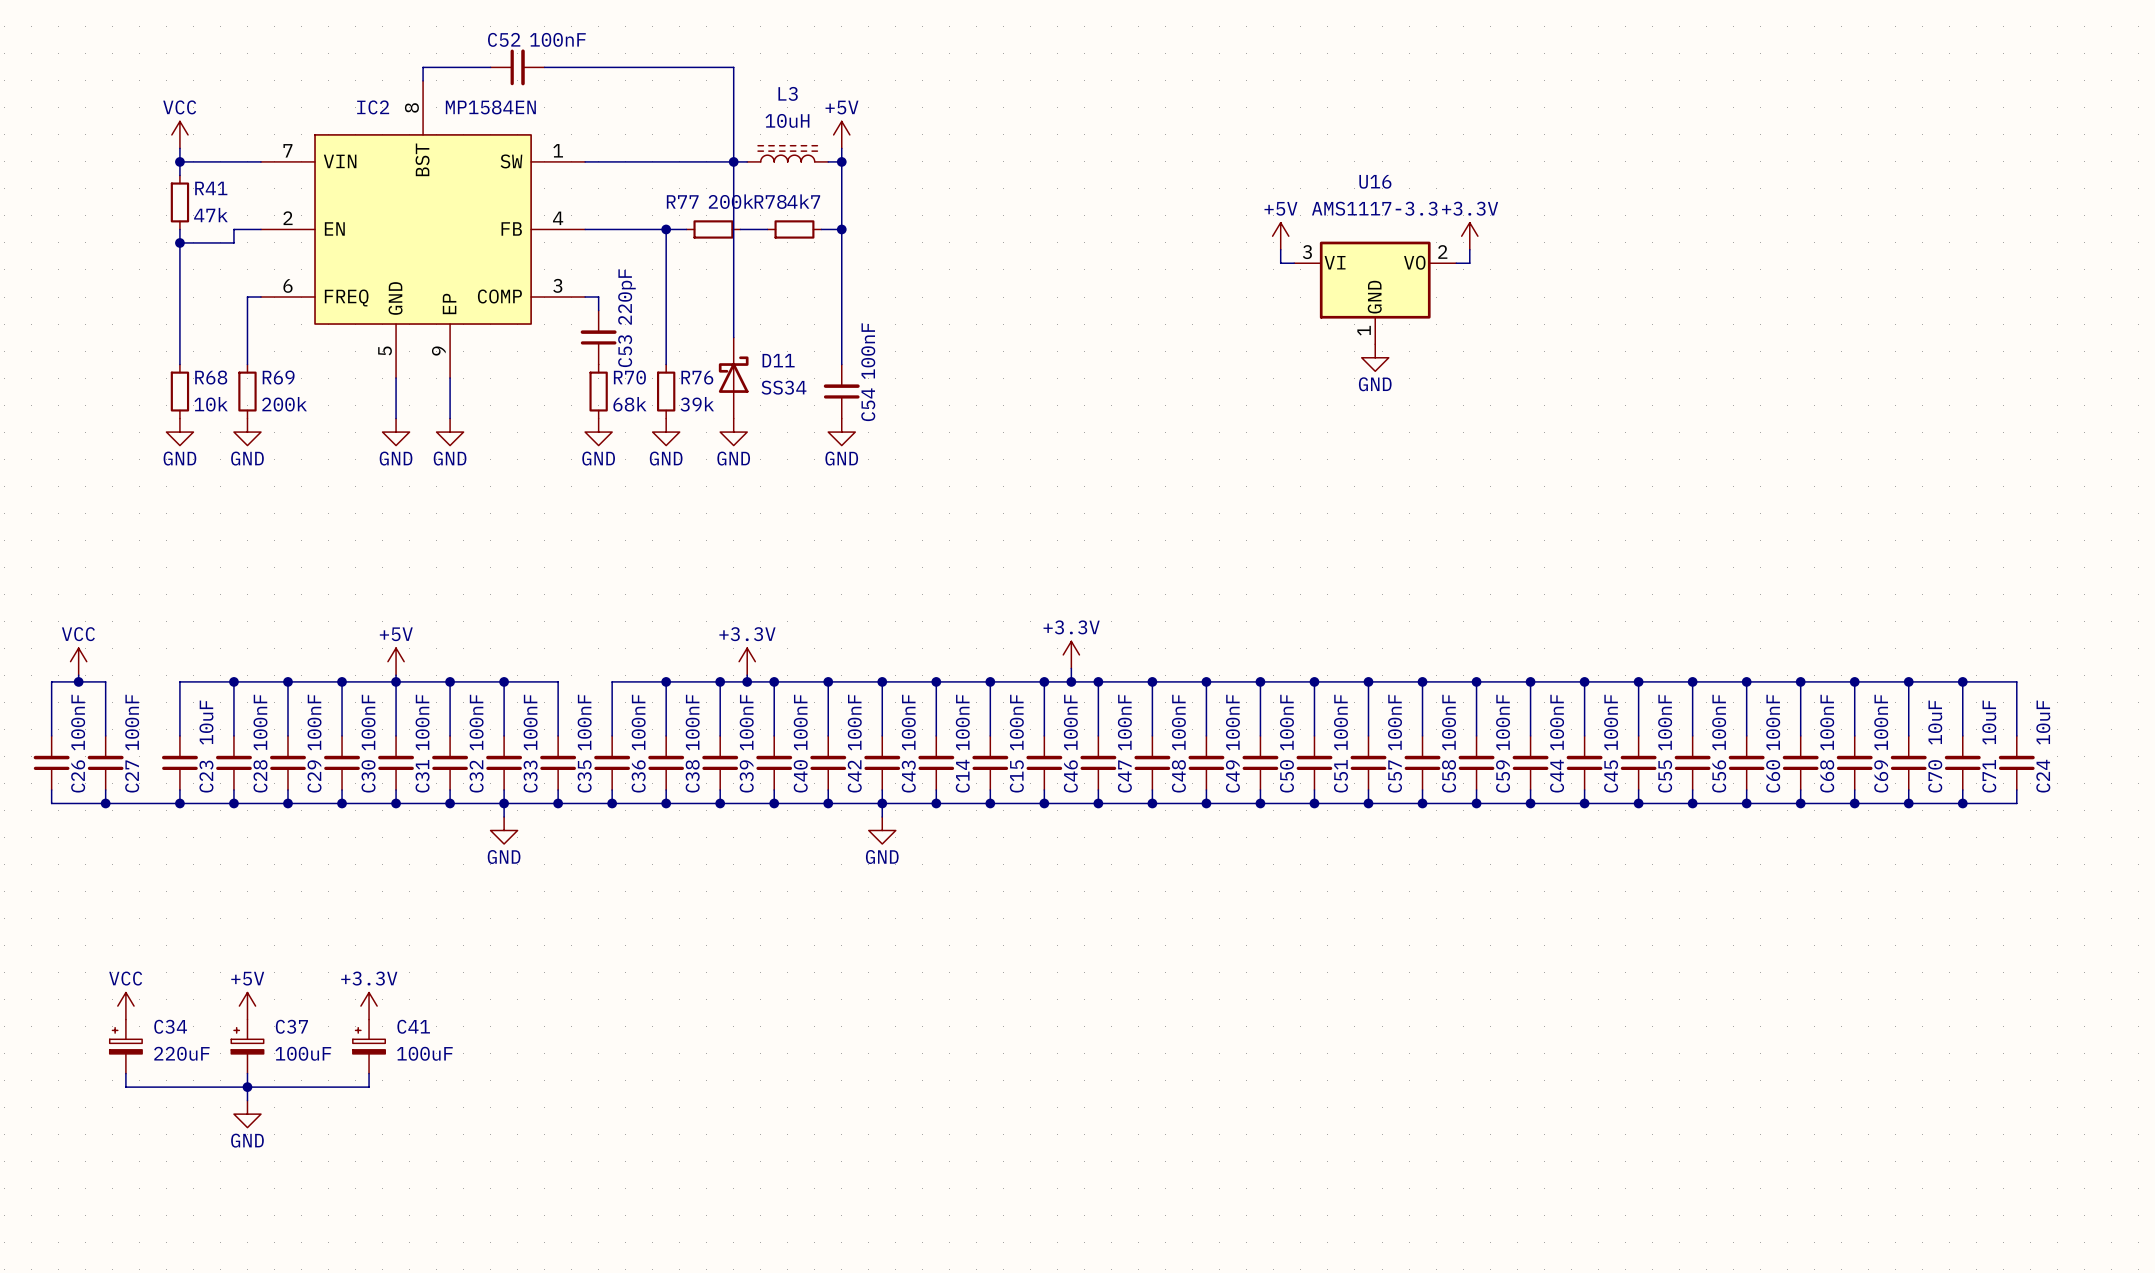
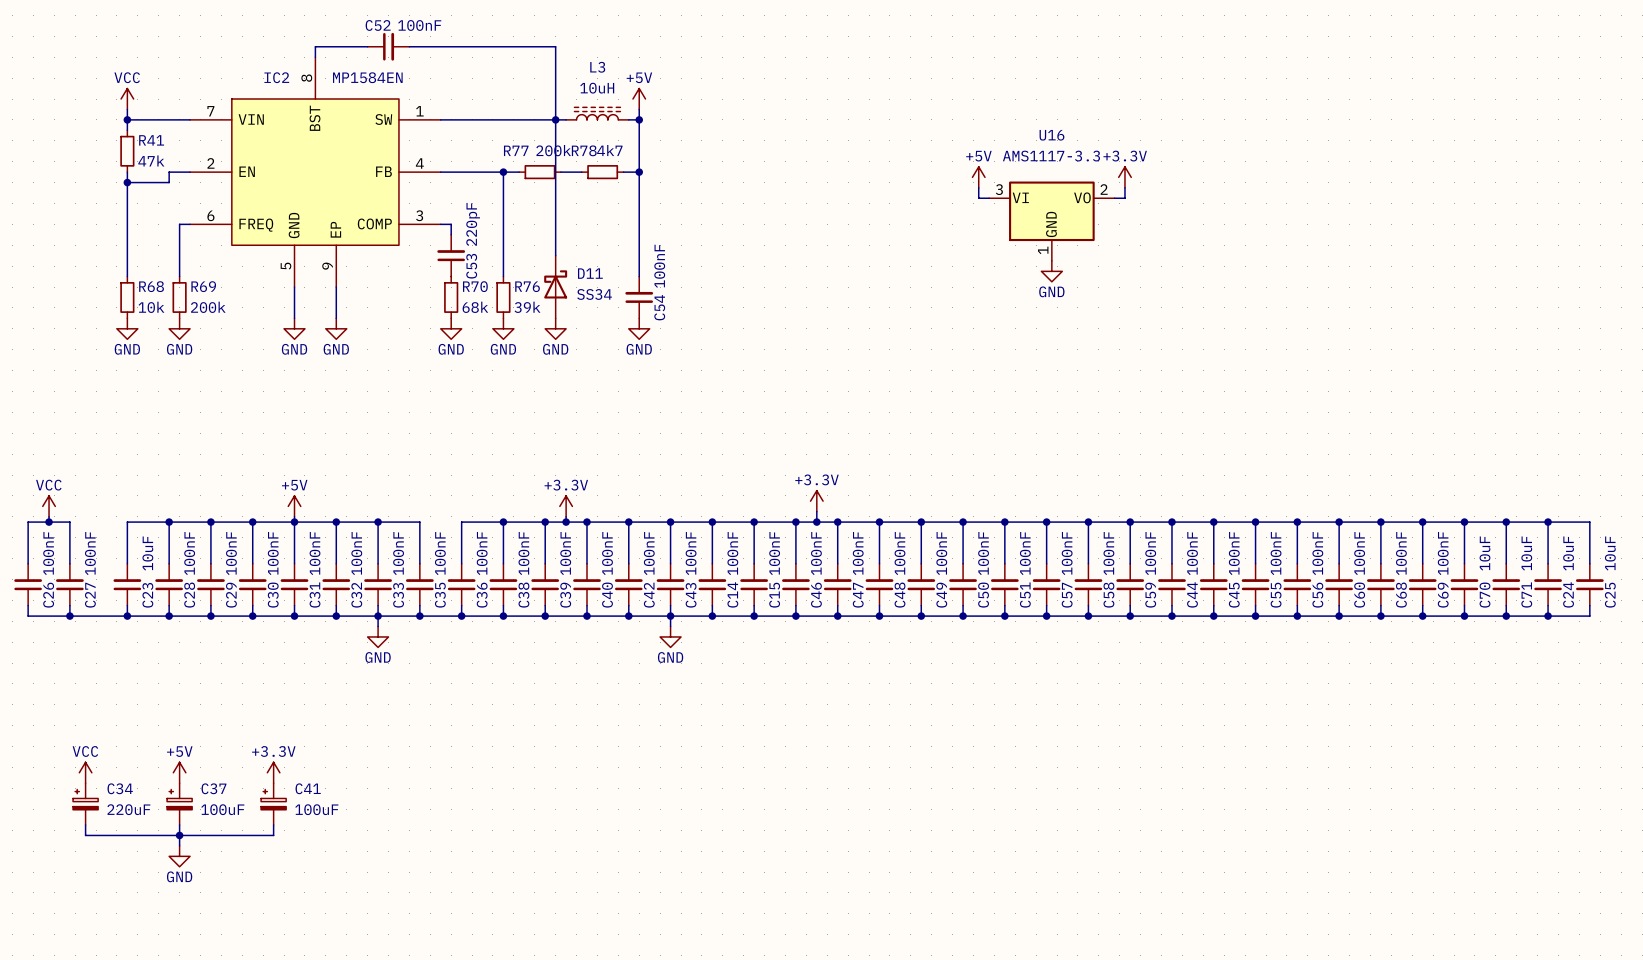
wire: none -> (1548, 522) (1589, 522) (1589, 563)
junction: none -> (1548, 522)
C25: none -> 10uF (1589, 584)
wire: none -> (1589, 605) (1589, 616) (1548, 616)
junction: none -> (1548, 616)

